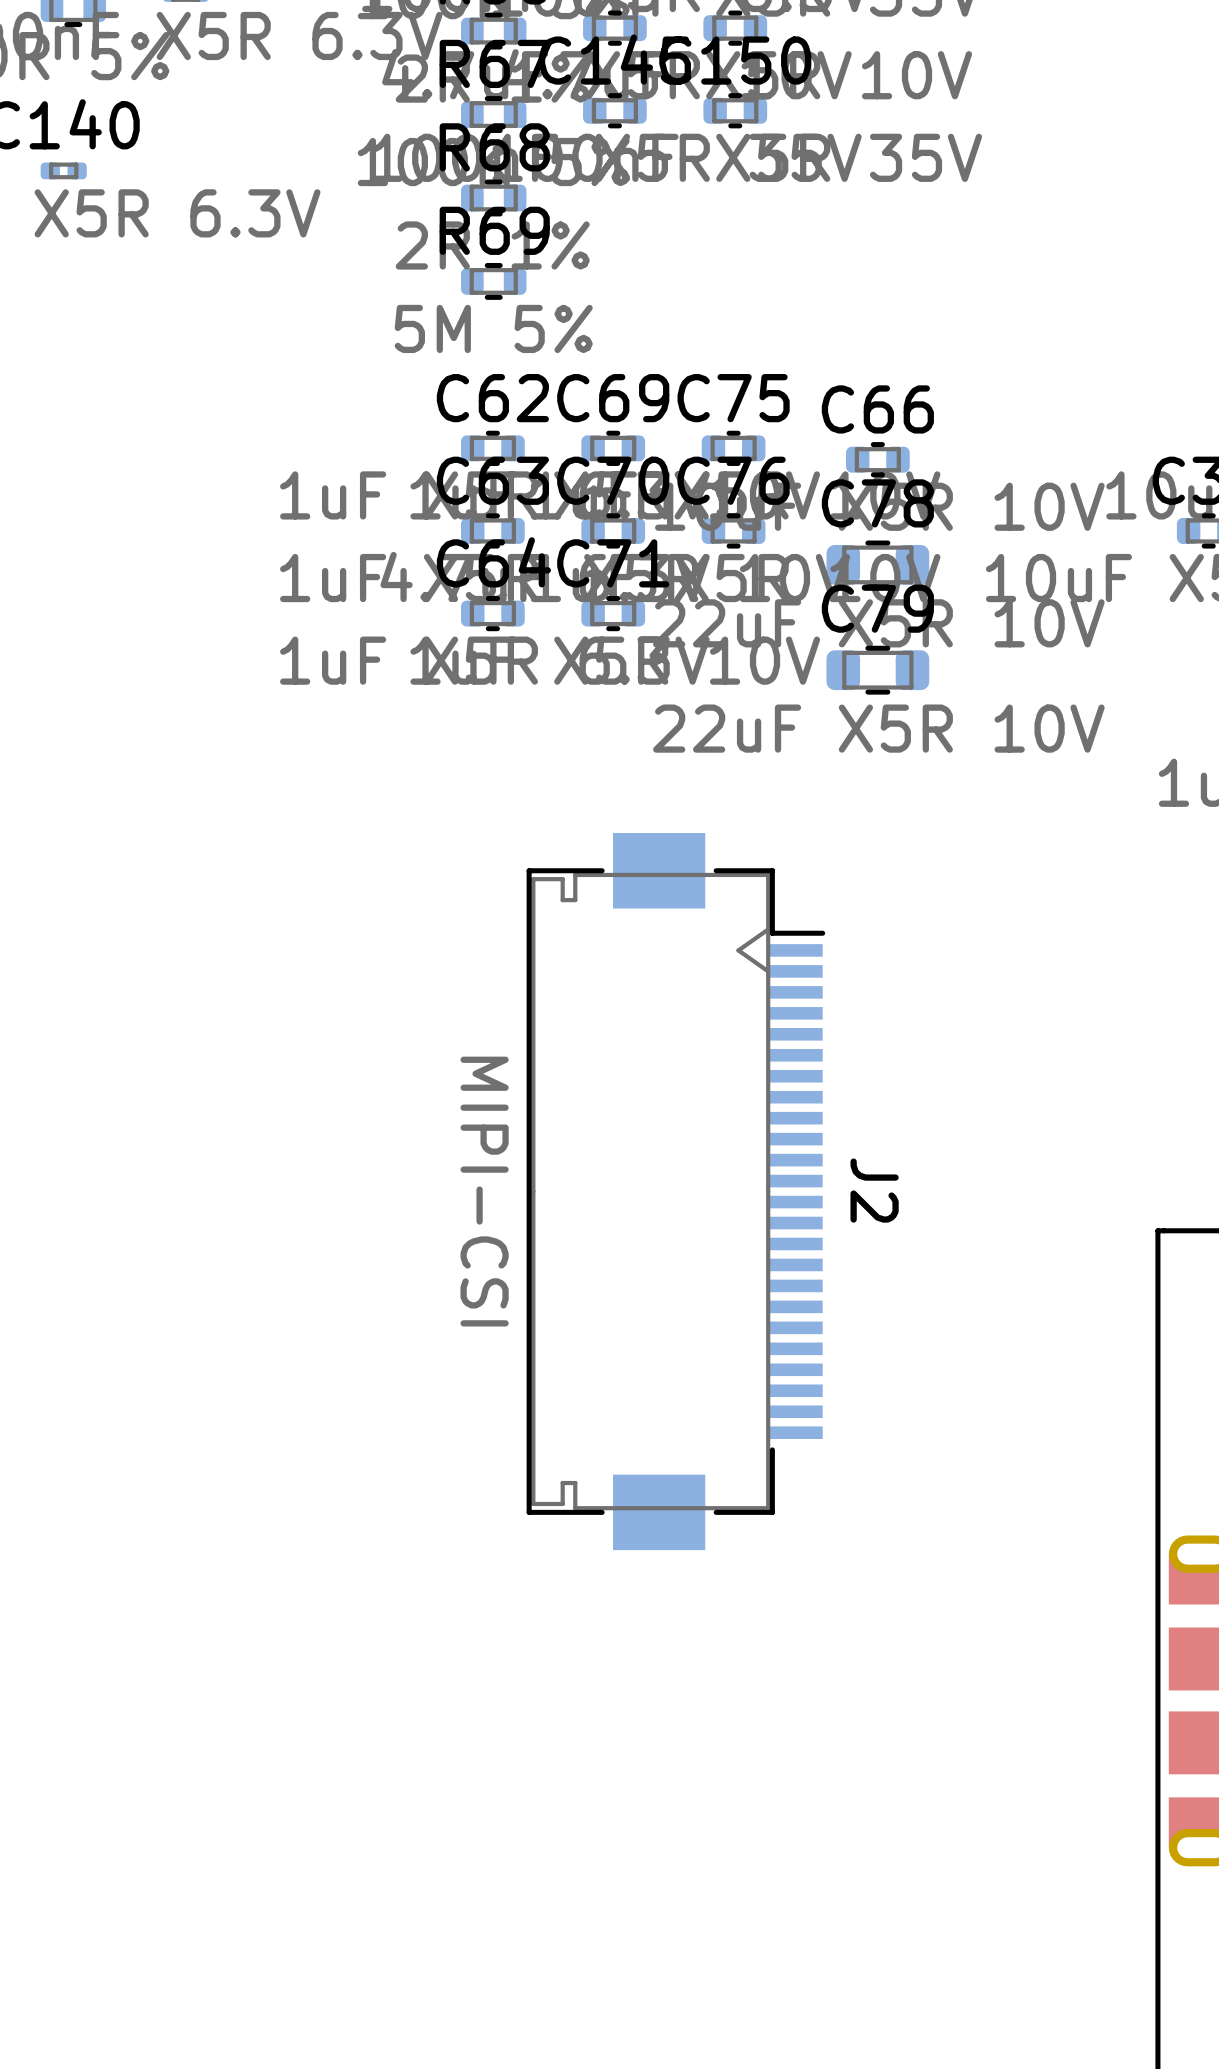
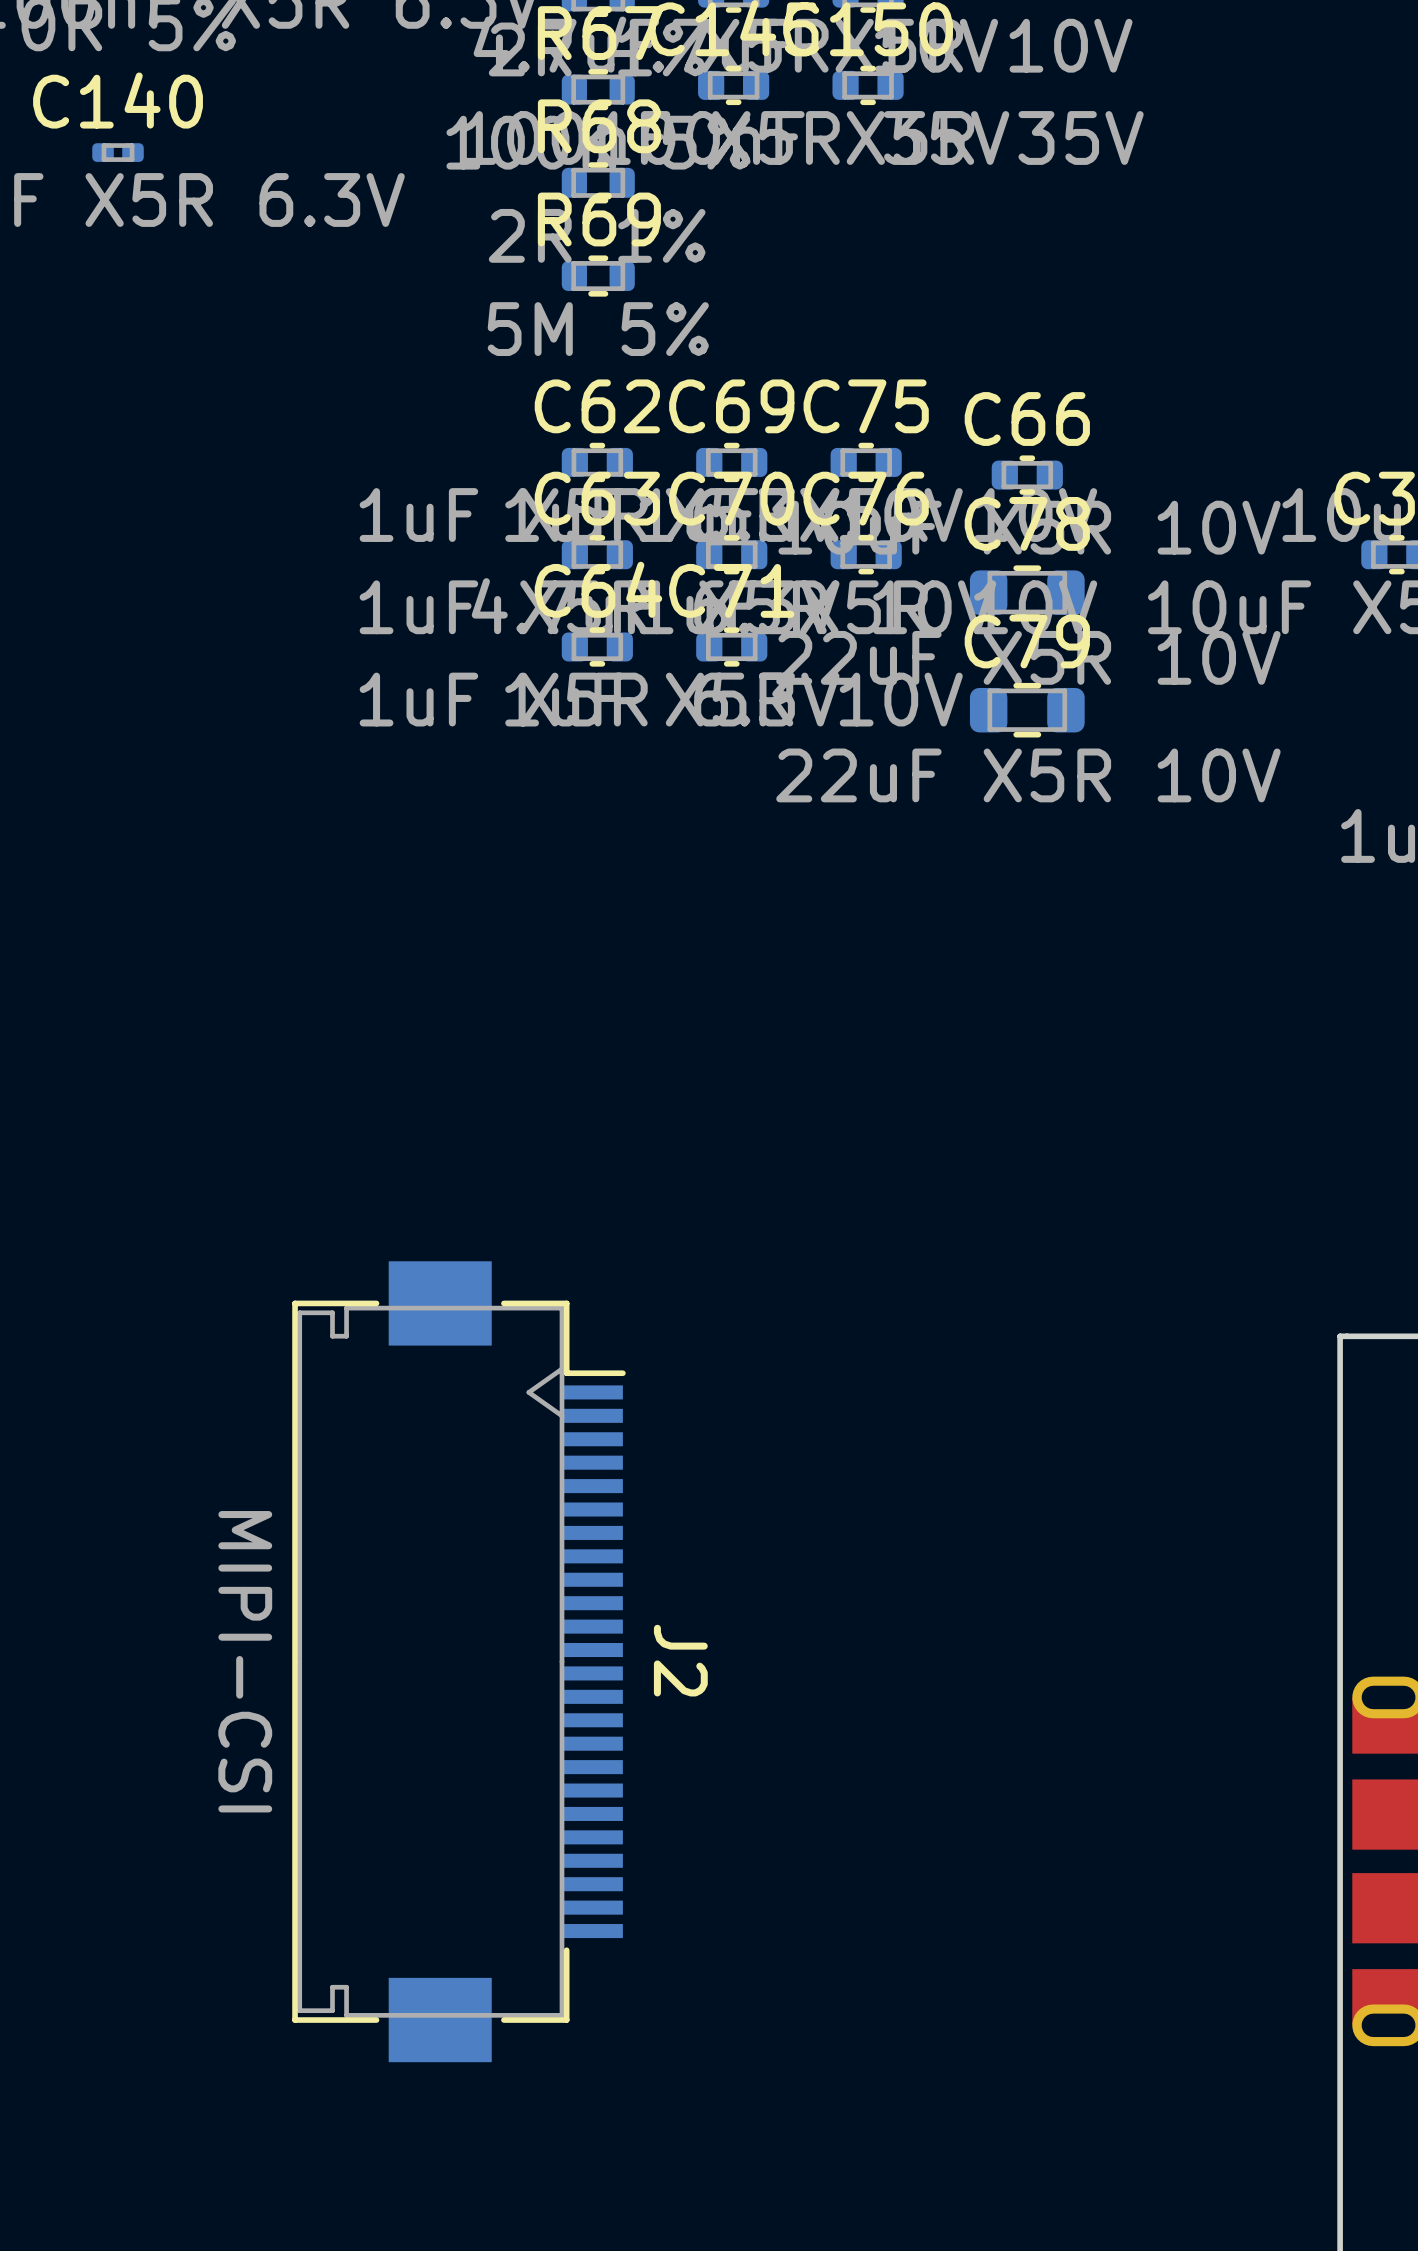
J2 position: (675, 1191) -> (458, 1661)

